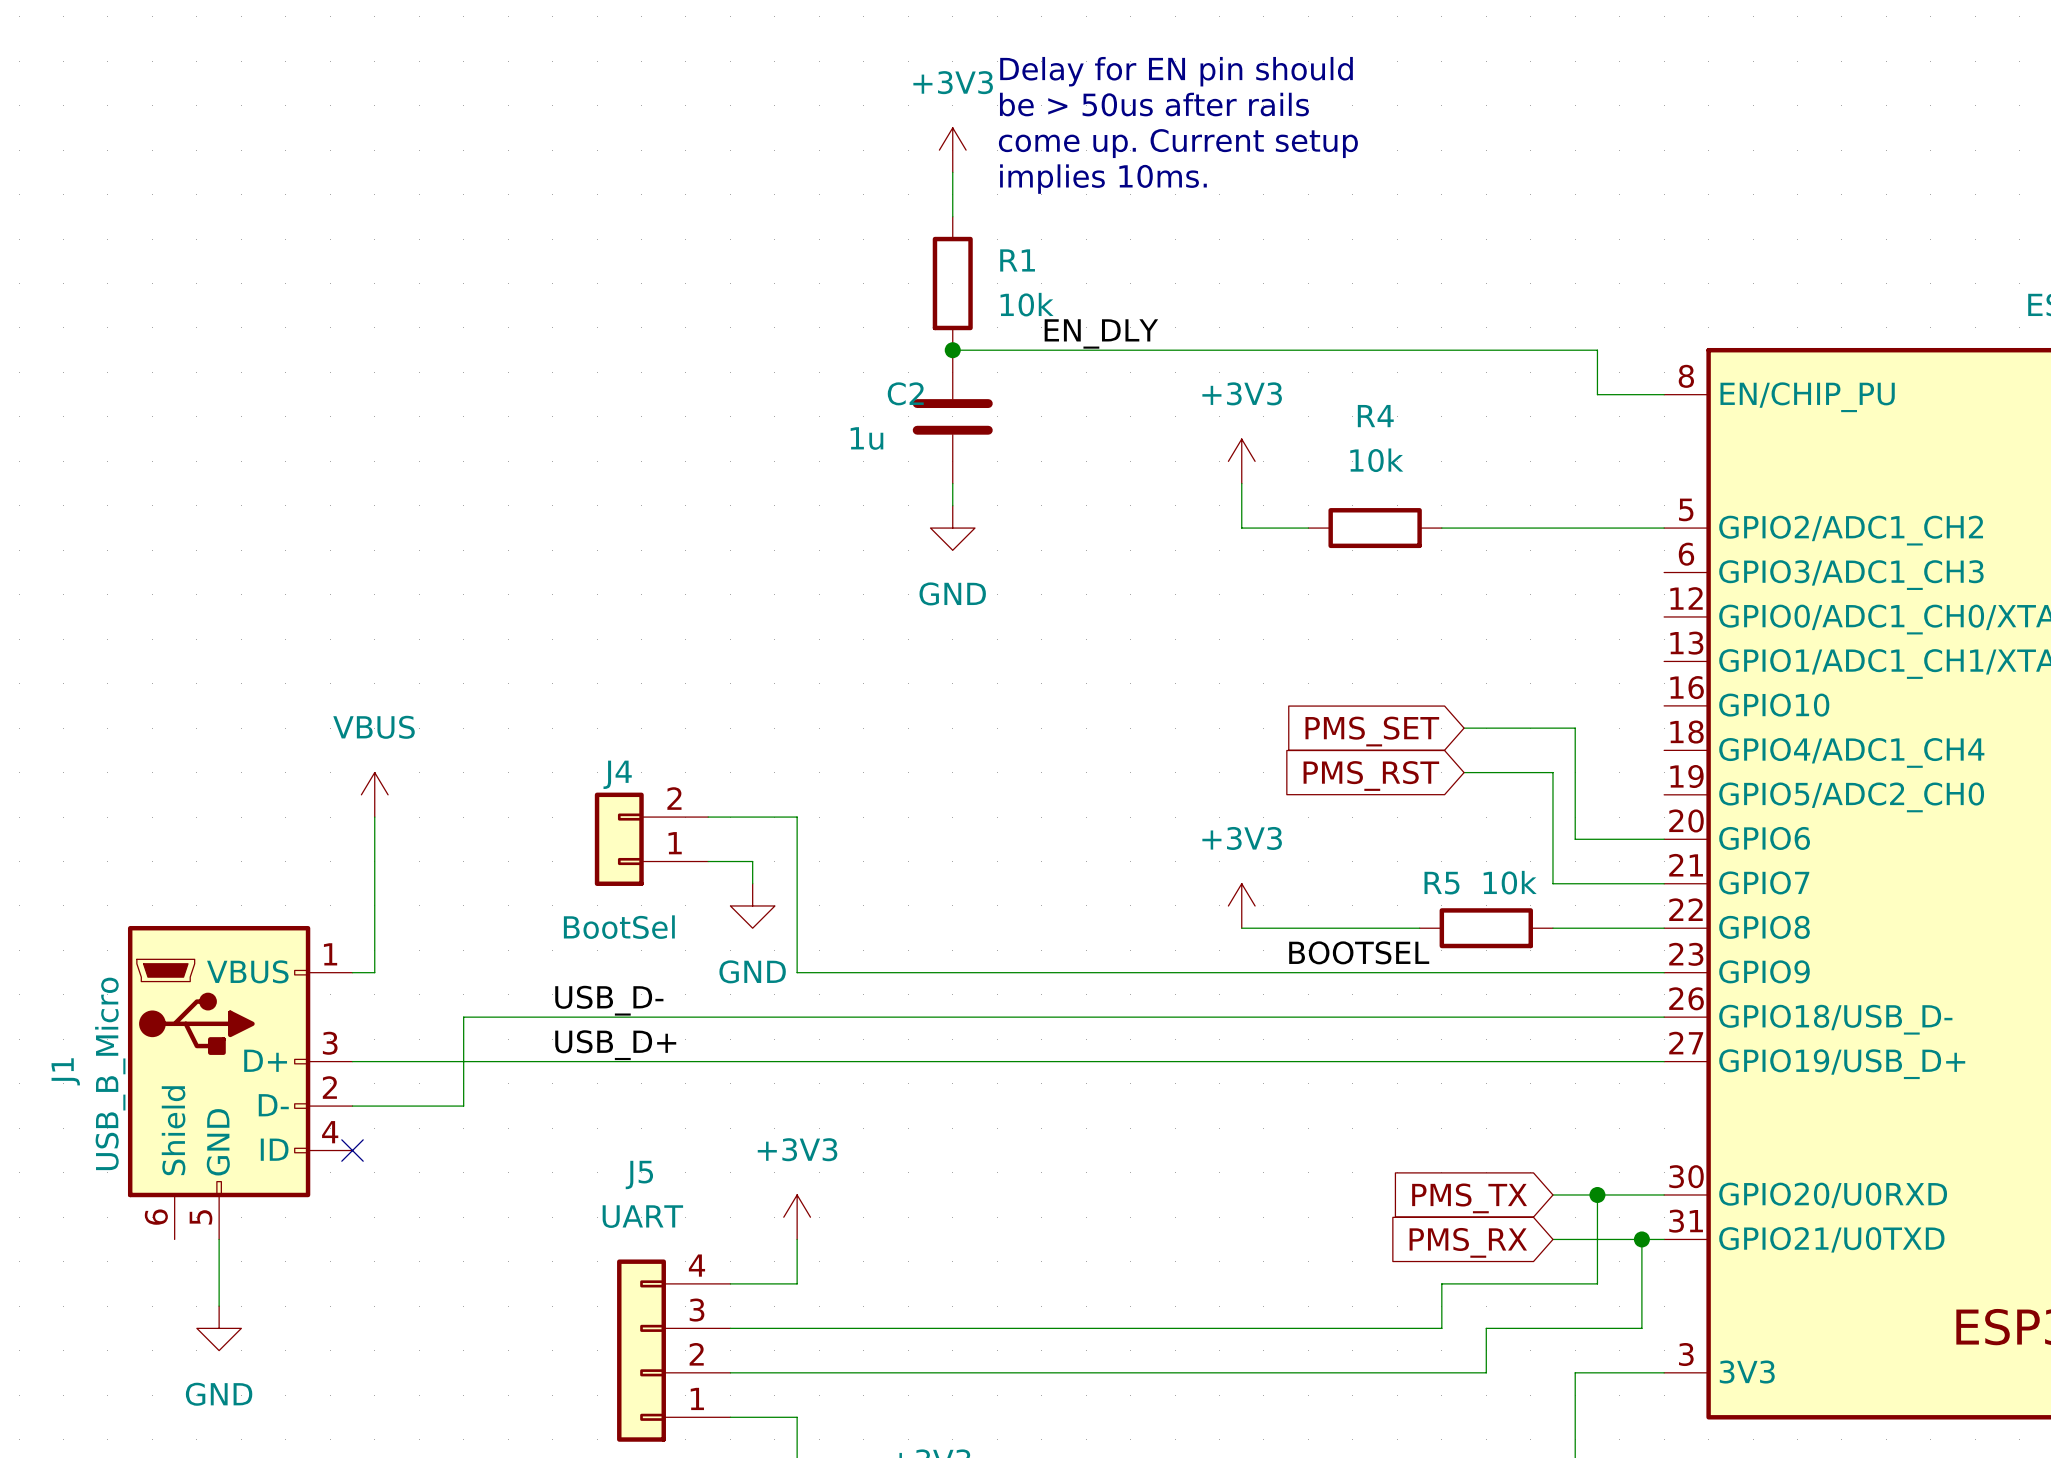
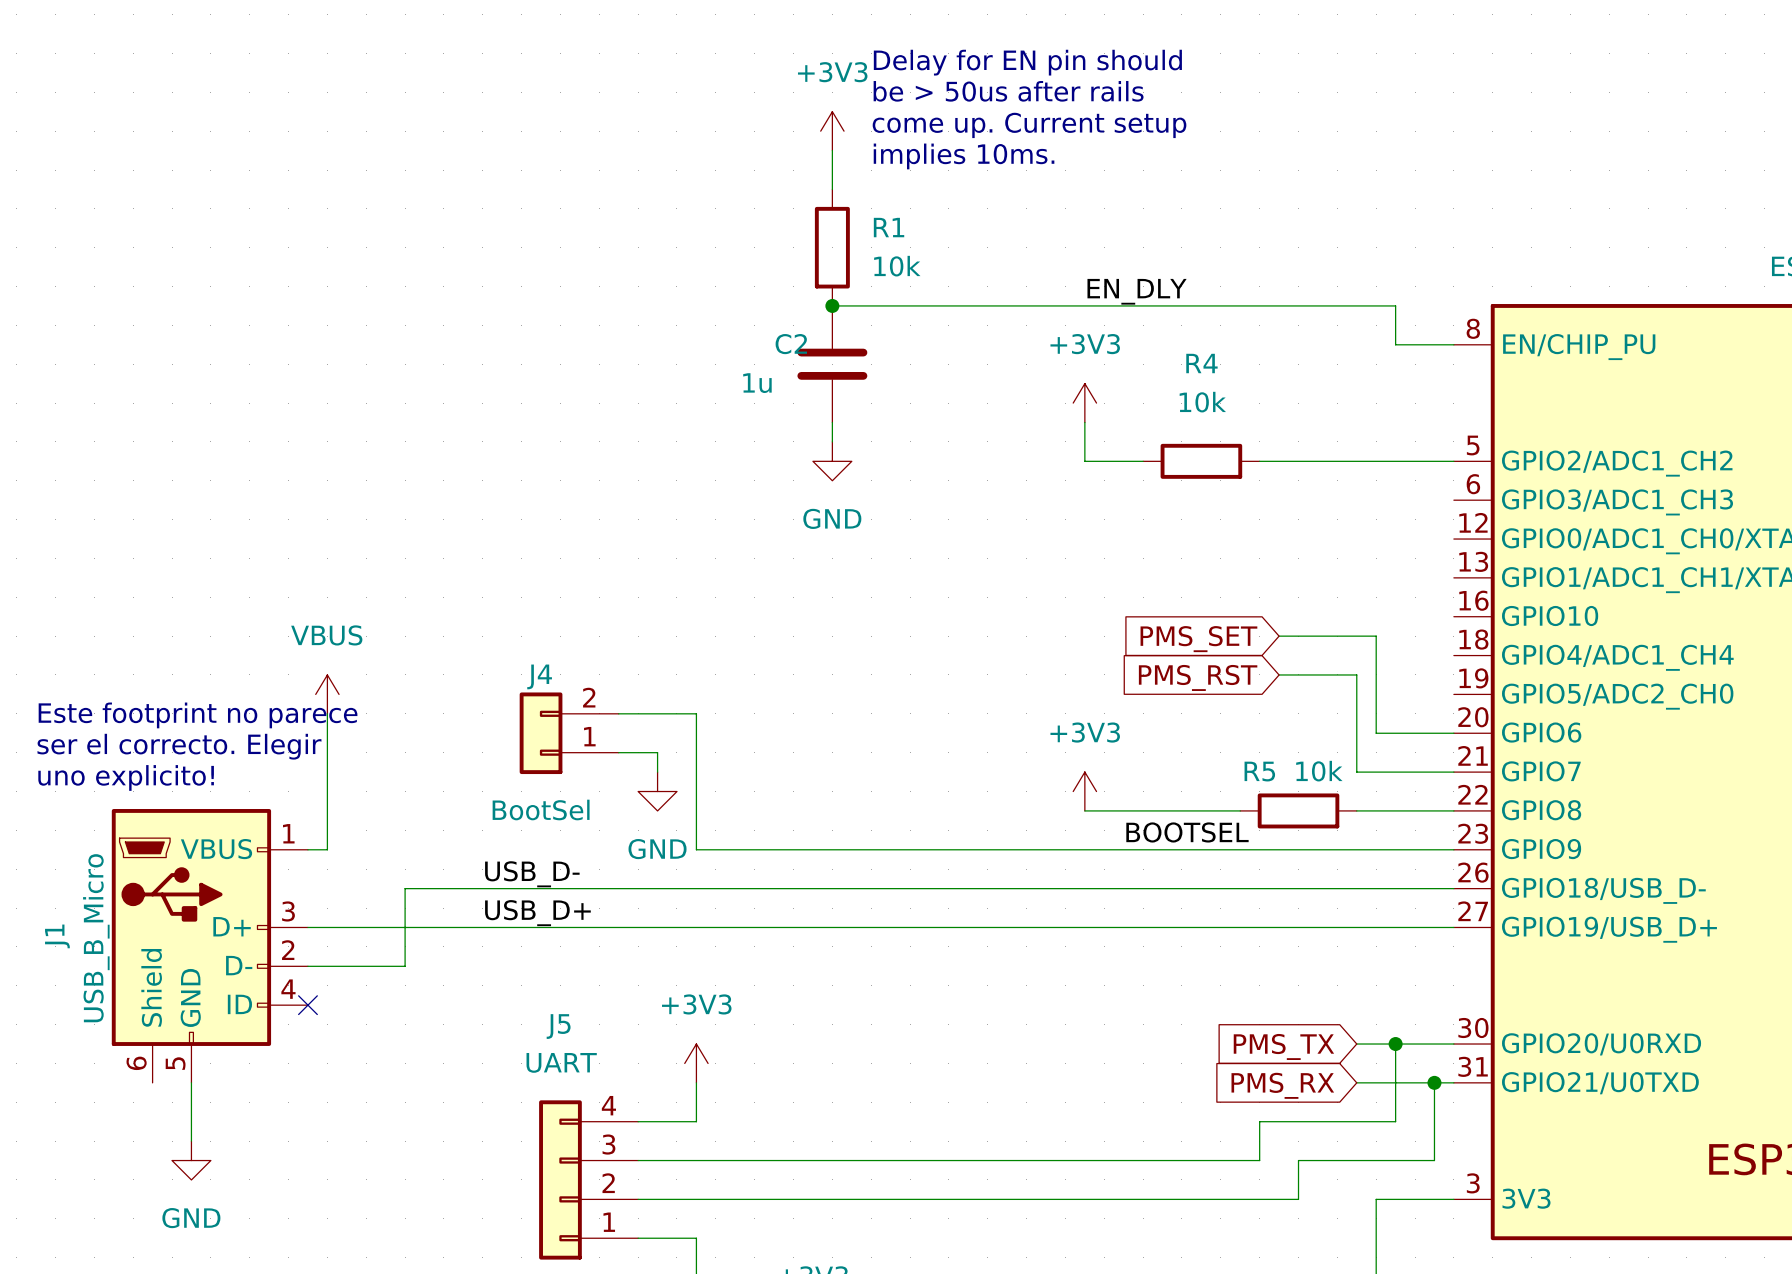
label position: EN_DLY (1101, 333) -> EN_DLY (1137, 291)
text: none -> Este footprint no parece (198, 715)
text: none -> ser el correcto. Elegir (179, 746)
text: none -> uno explicito! (126, 777)

